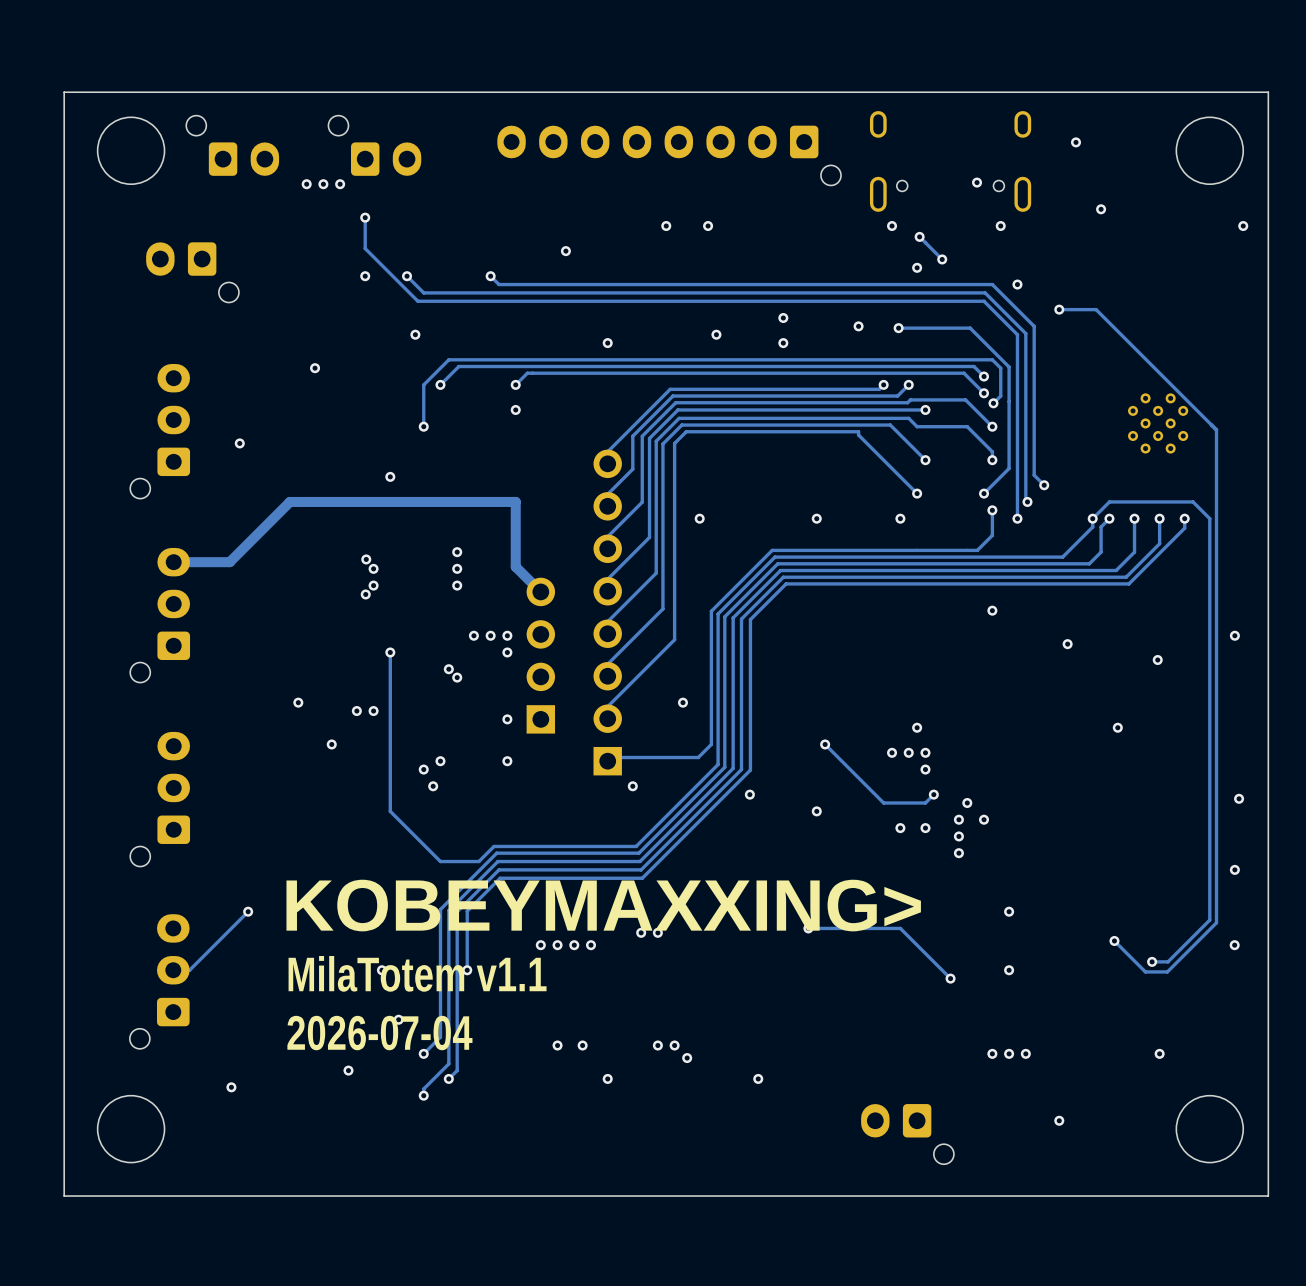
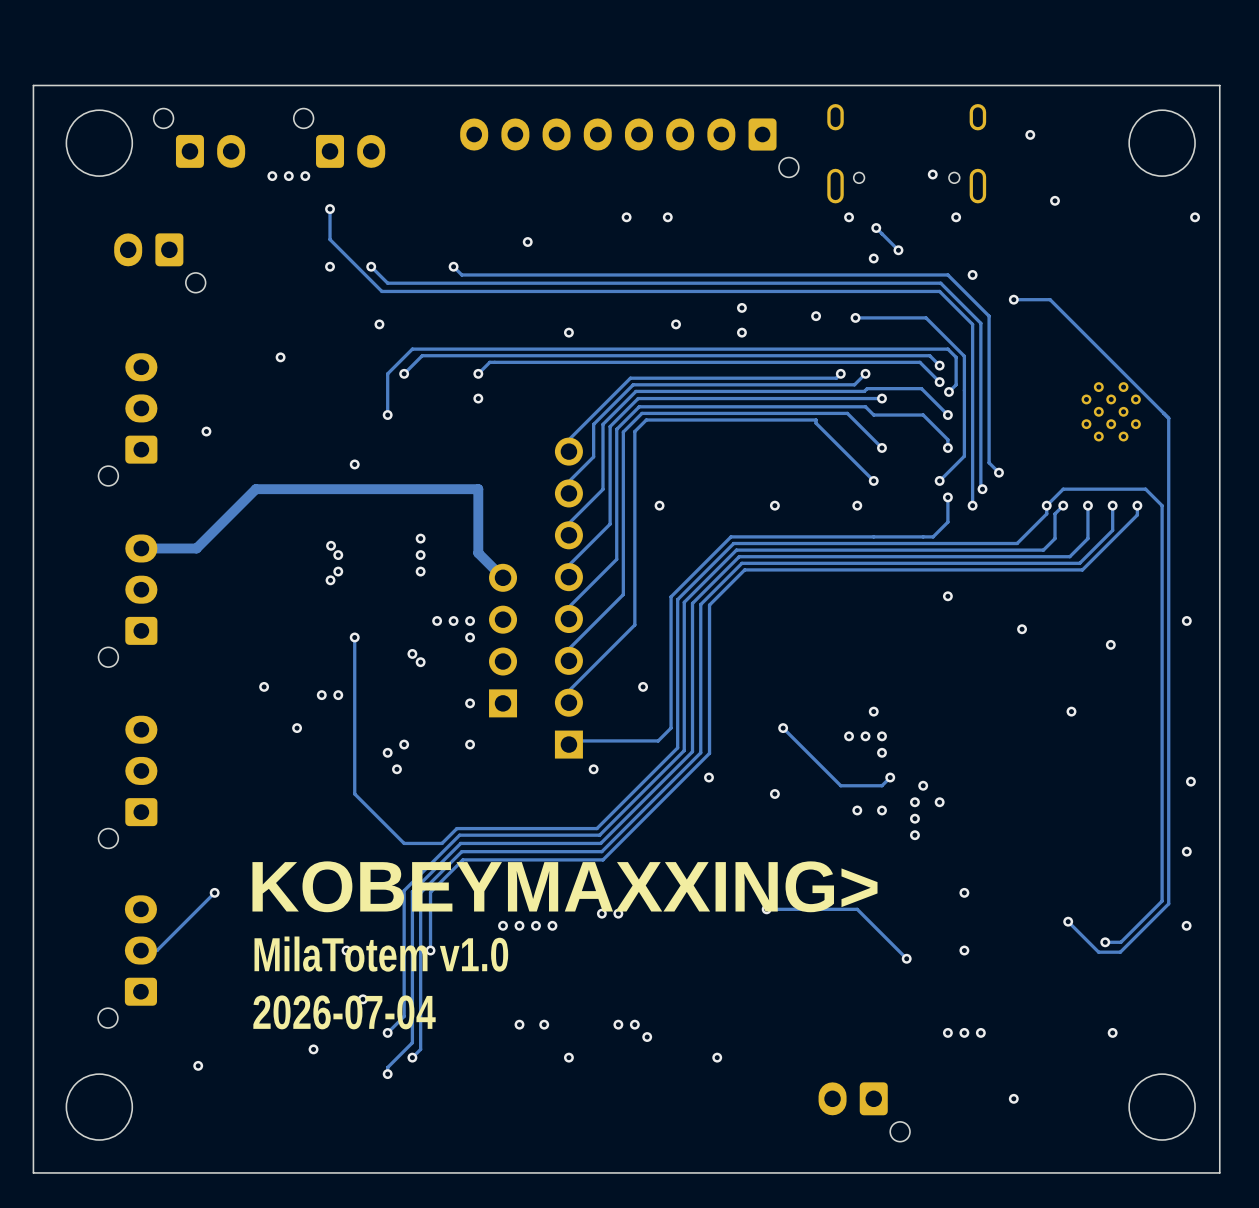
text: MilaTotem v1.1 (417, 973) -> MilaTotem v1.0 (381, 954)

